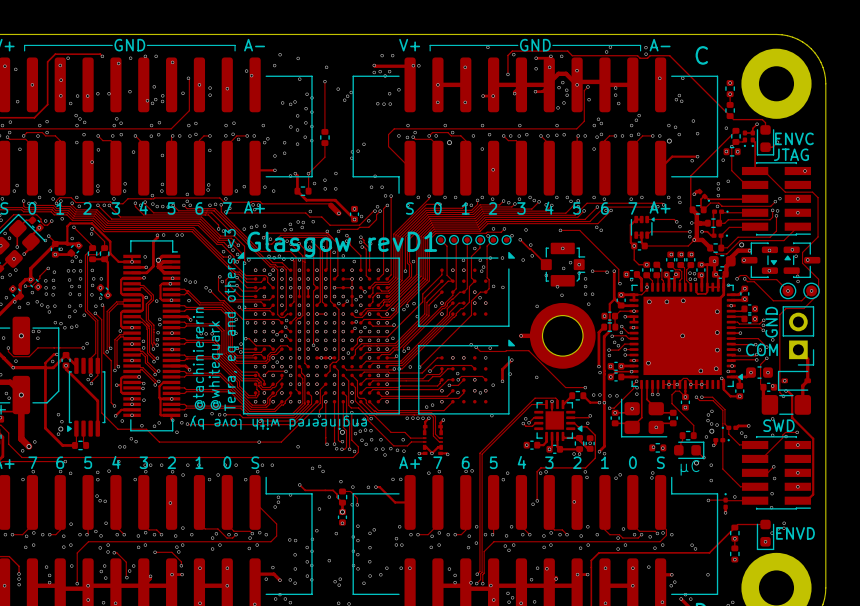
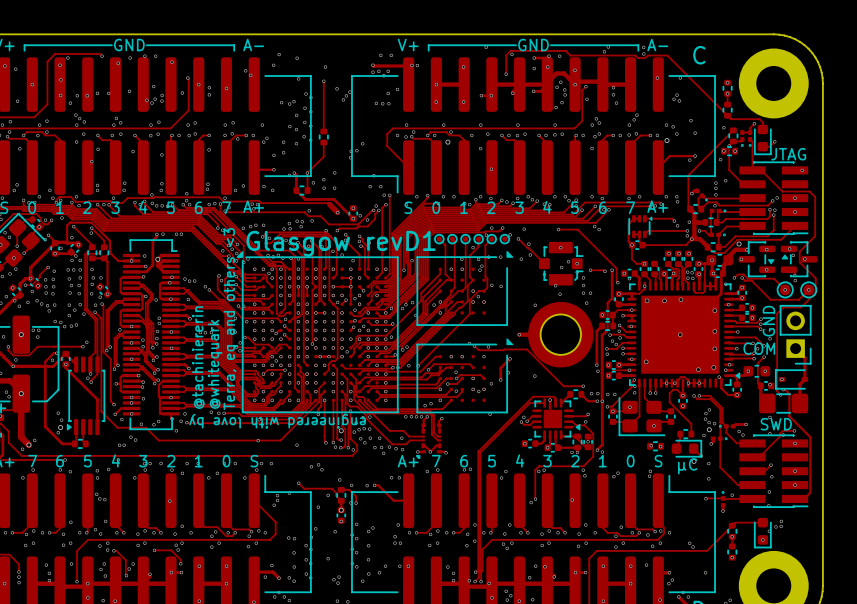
text: ENVC (794, 138) -> none
text: ENVD (795, 533) -> none

